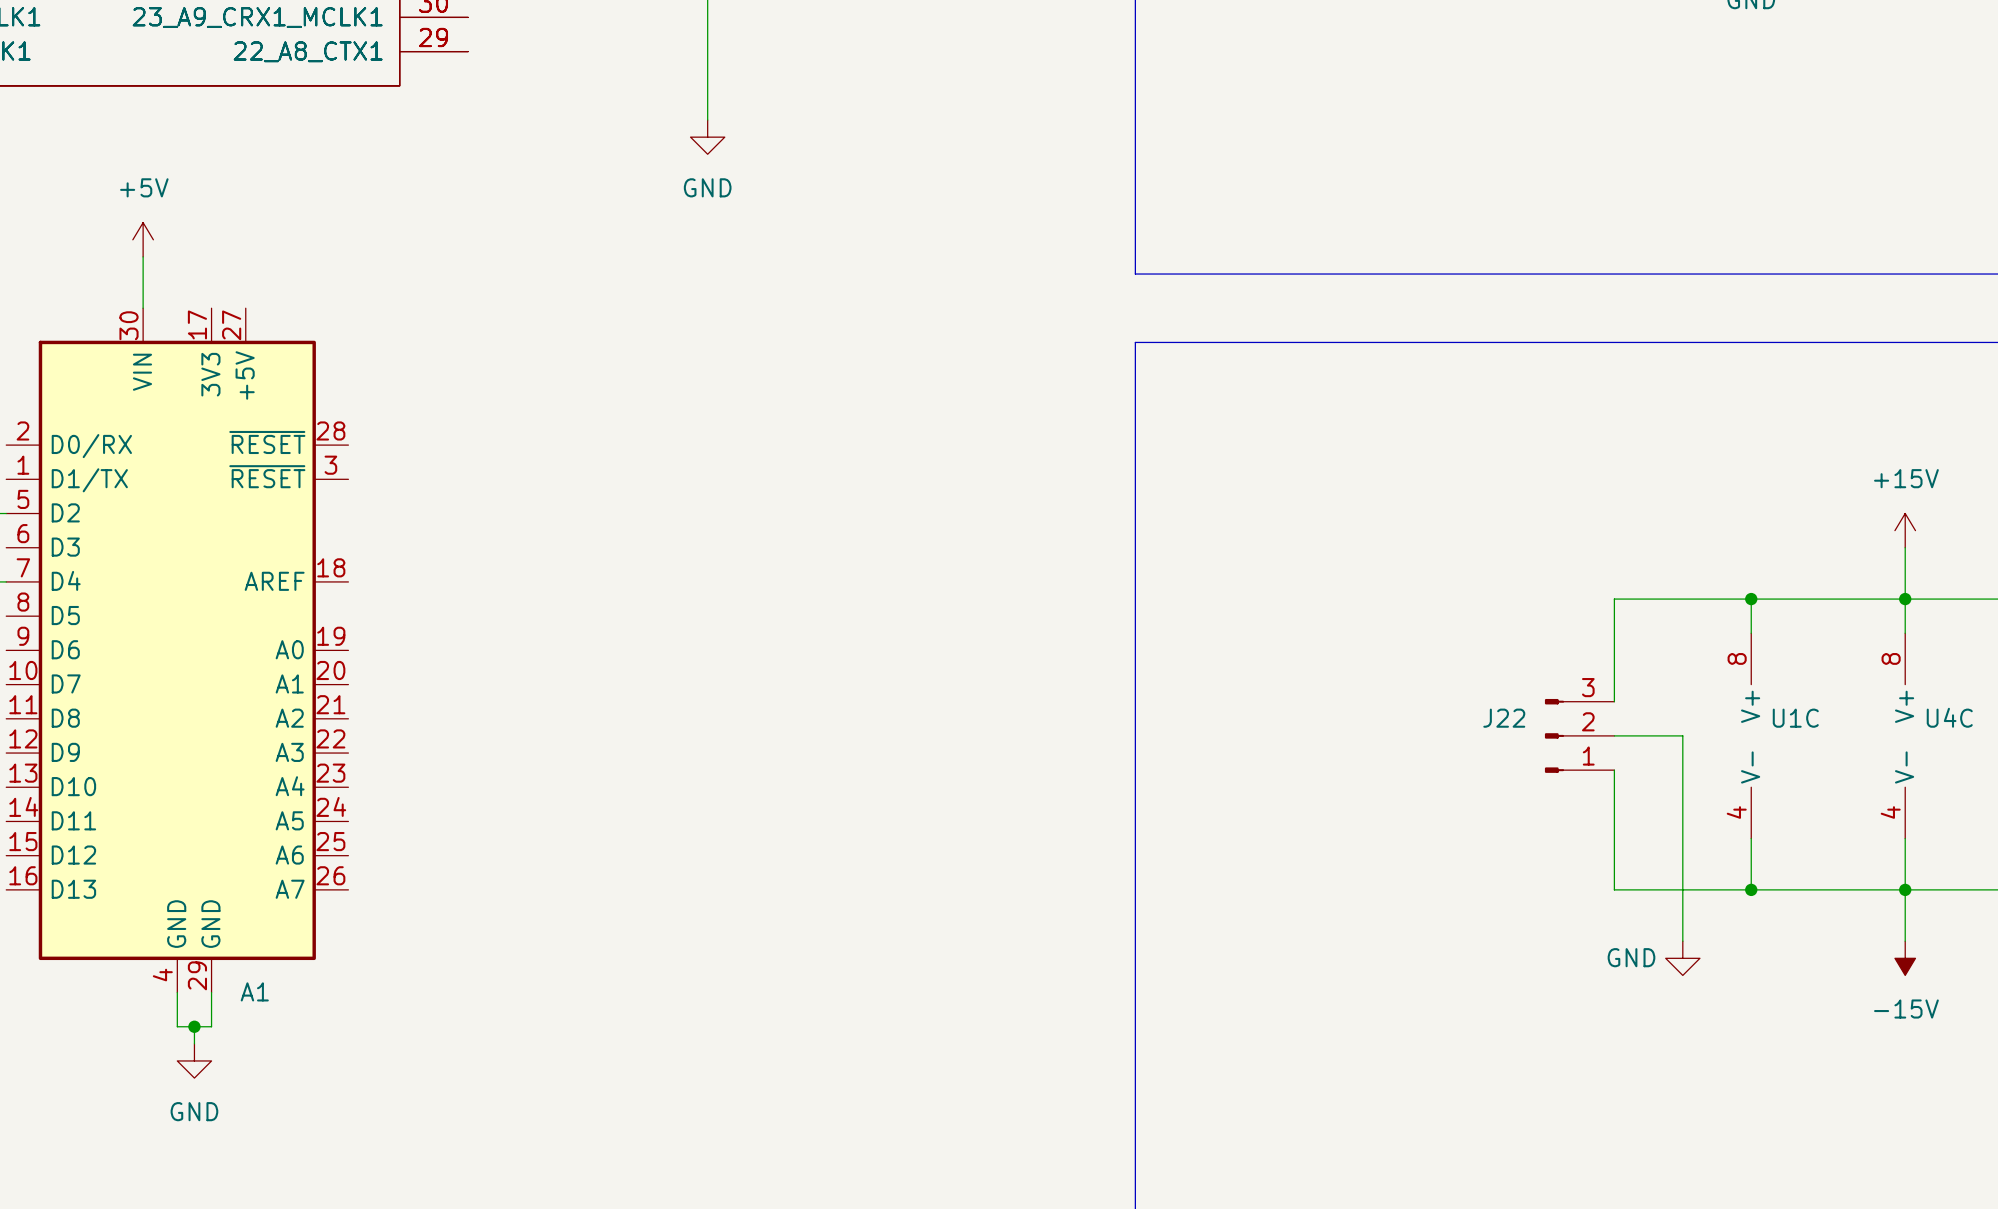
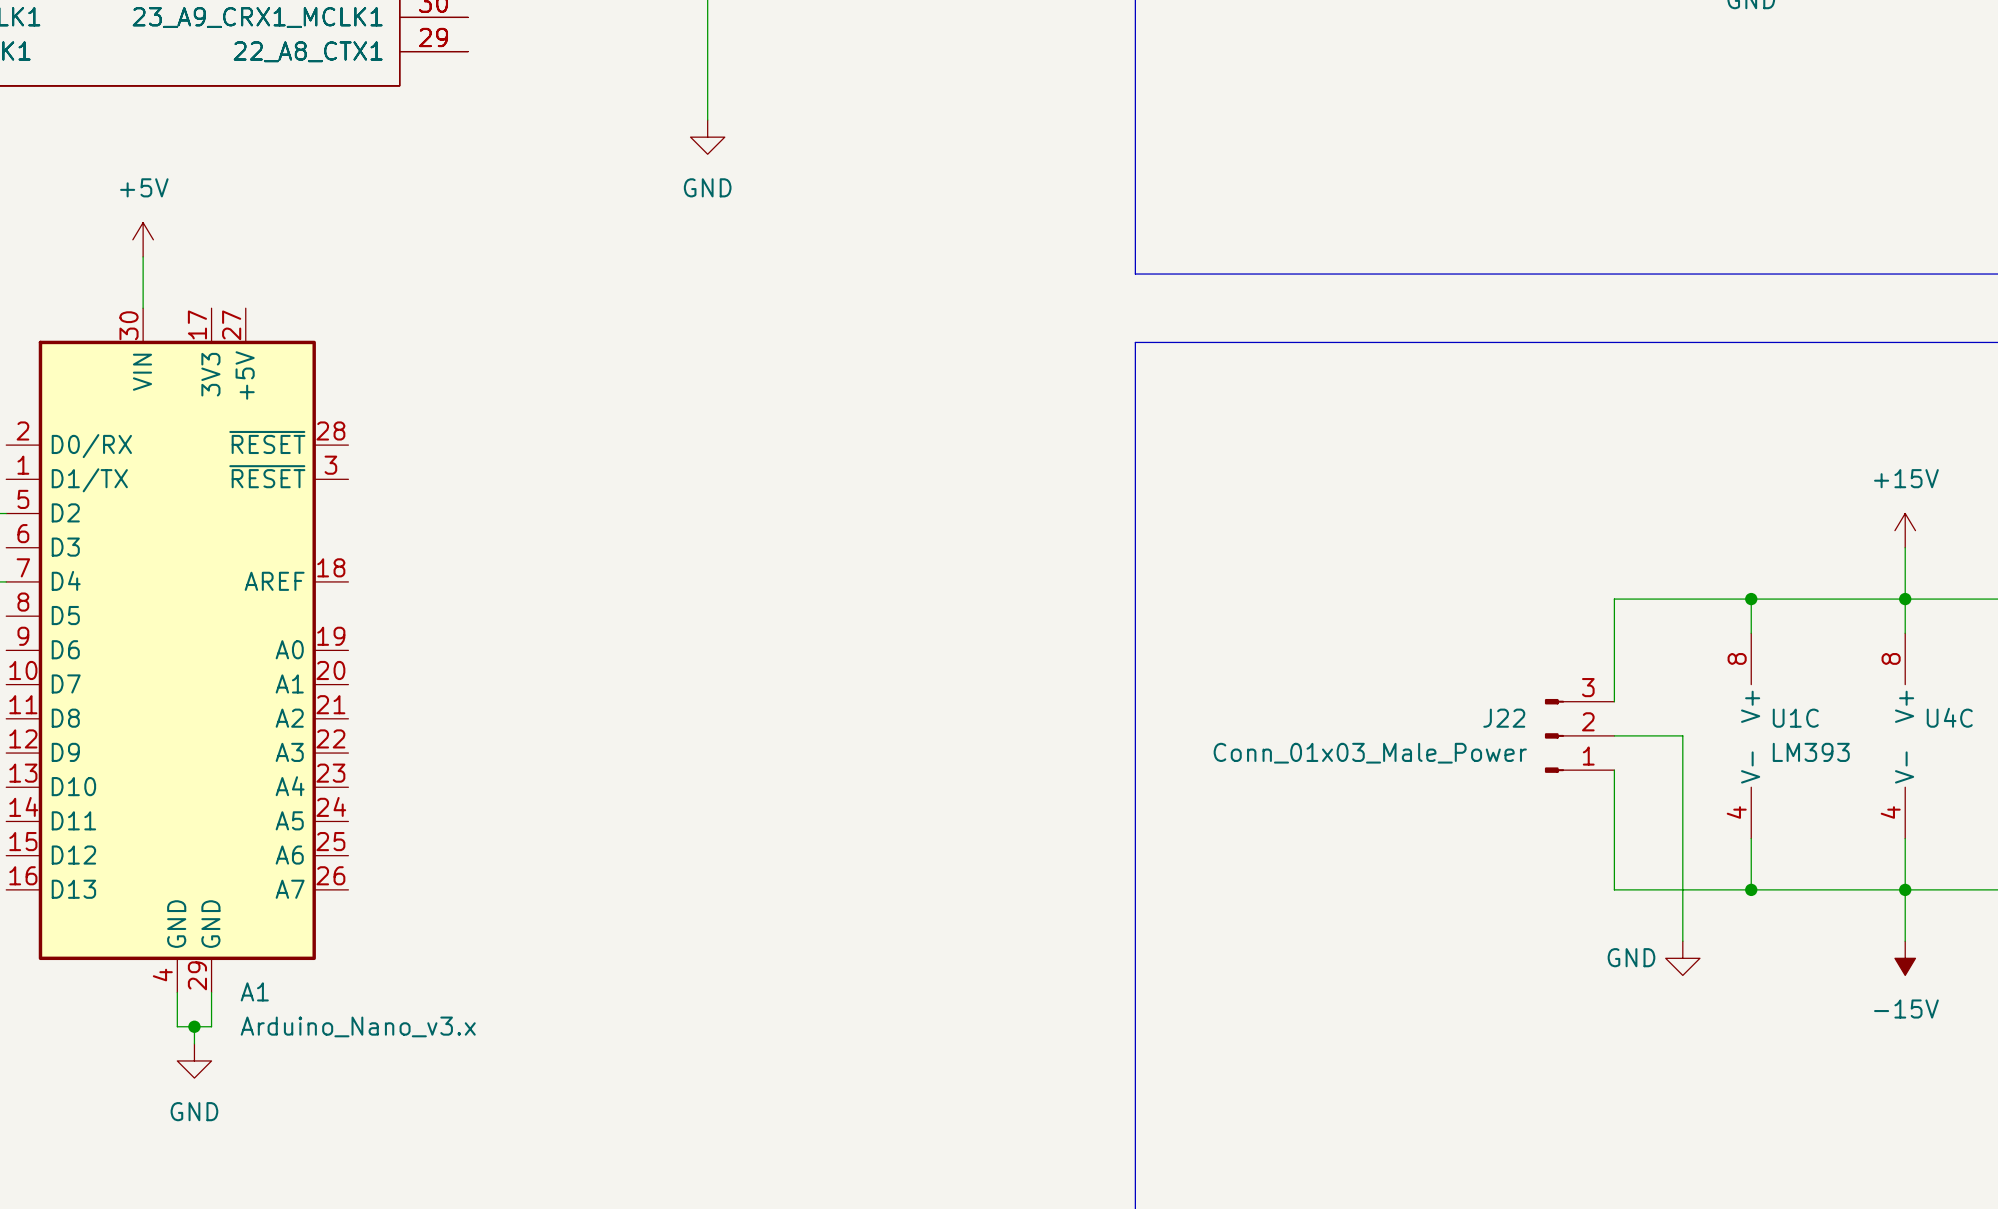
U1C value: none -> LM393 (1811, 752)
J22 value: none -> Conn_01x03_Male_Power (1370, 753)
A1 value: none -> Arduino_Nano_v3.x (358, 1026)

